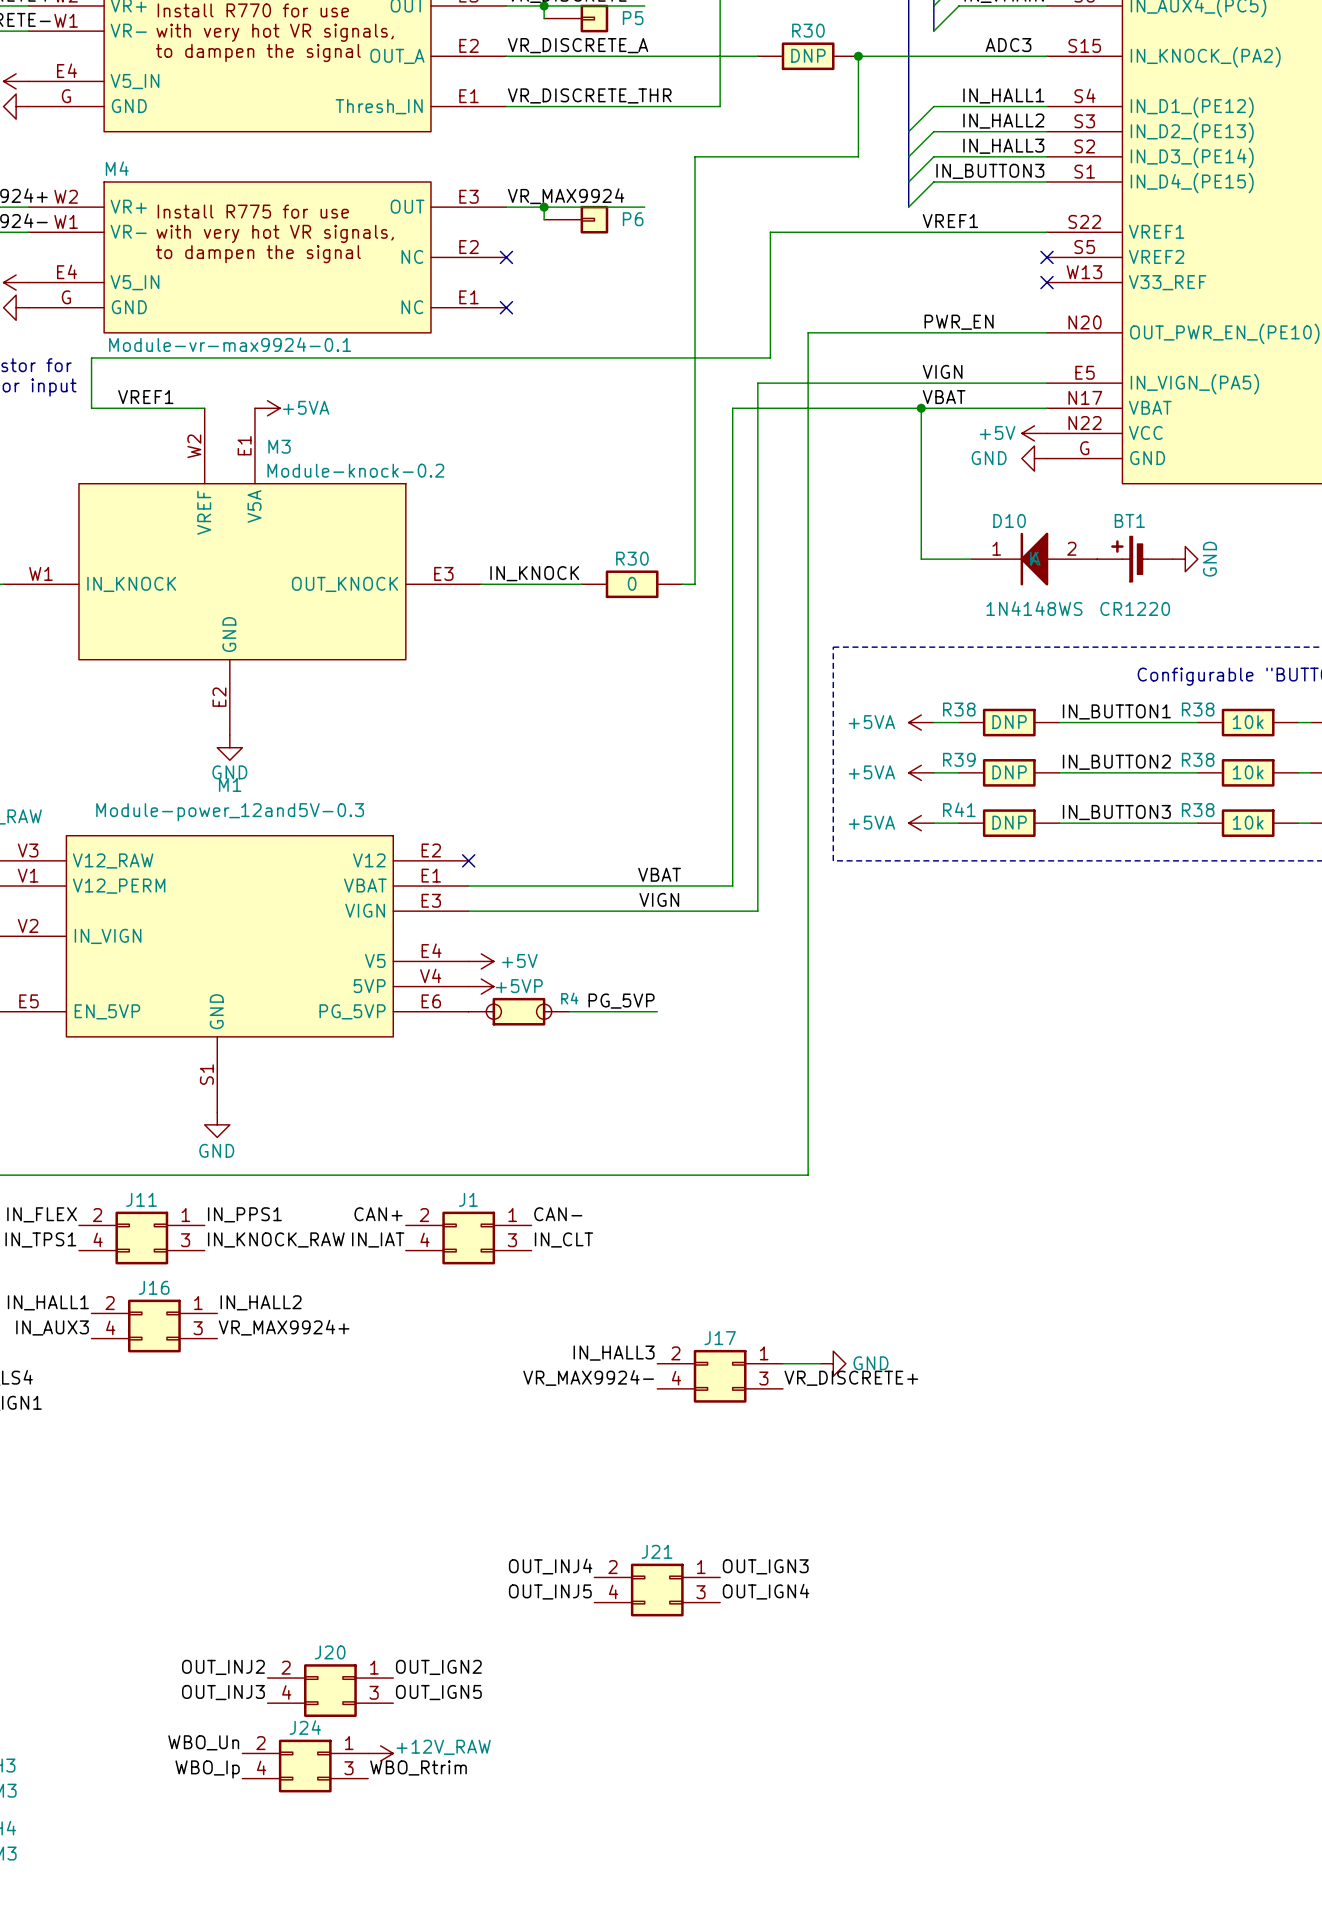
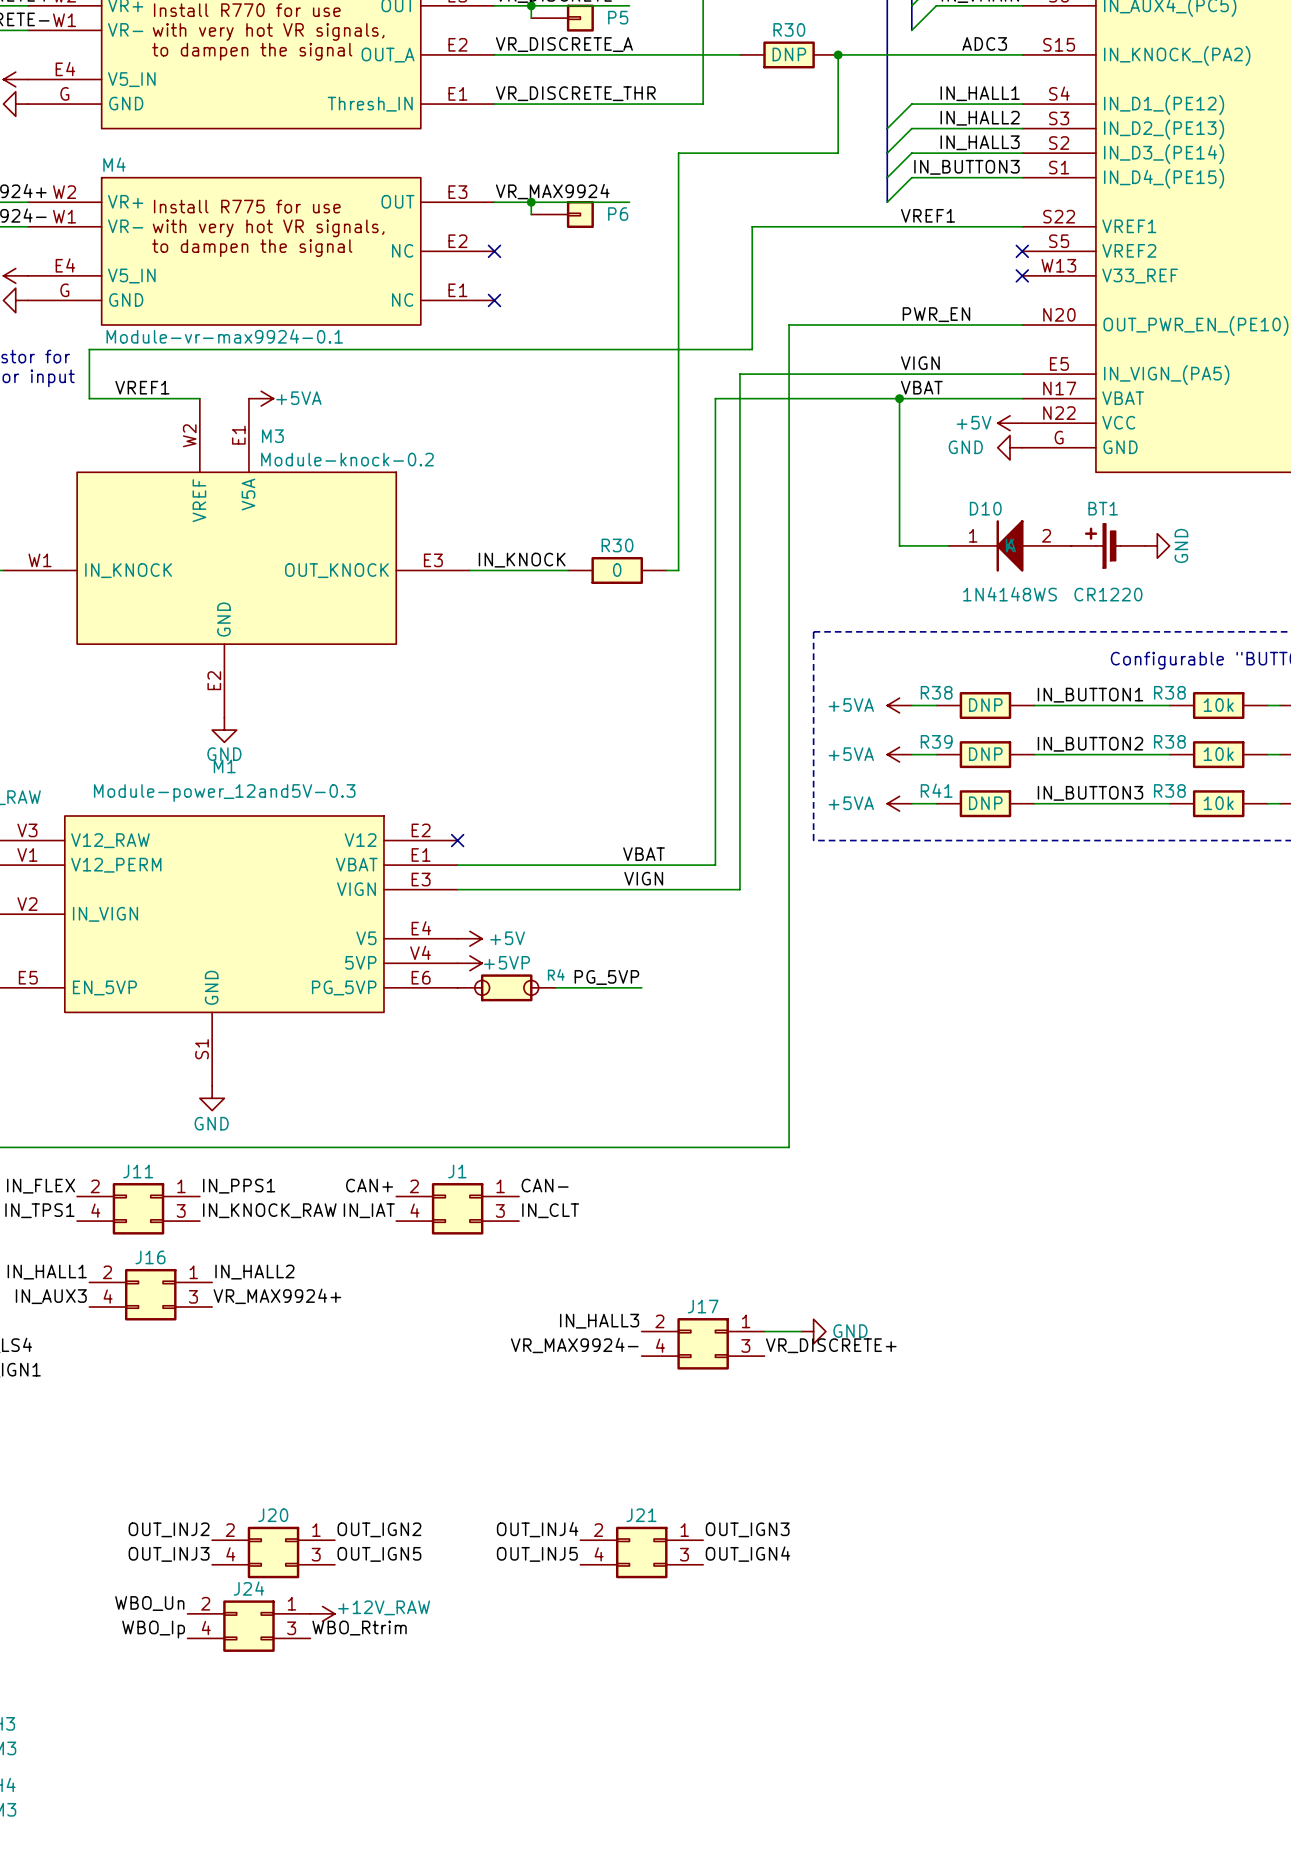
label position: OUT_INJ2 (223, 1667) -> OUT_INJ2 (169, 1529)
label position: OUT_IGN2 (438, 1667) -> OUT_IGN2 (379, 1529)
J20 position: (330, 1690) -> (273, 1552)
label position: OUT_INJ3 (223, 1692) -> OUT_INJ3 (169, 1554)
label position: OUT_IGN5 (438, 1692) -> OUT_IGN5 (379, 1554)
label position: WBO_Un (203, 1742) -> WBO_Un (149, 1603)
power symbol position: +12V_RAW (380, 1753) -> +12V_RAW (322, 1613)
J24 position: (305, 1766) -> (248, 1626)
label position: WBO_Rtrim (418, 1767) -> WBO_Rtrim (359, 1628)
label position: WBO_Ip (207, 1769) -> WBO_Ip (153, 1629)

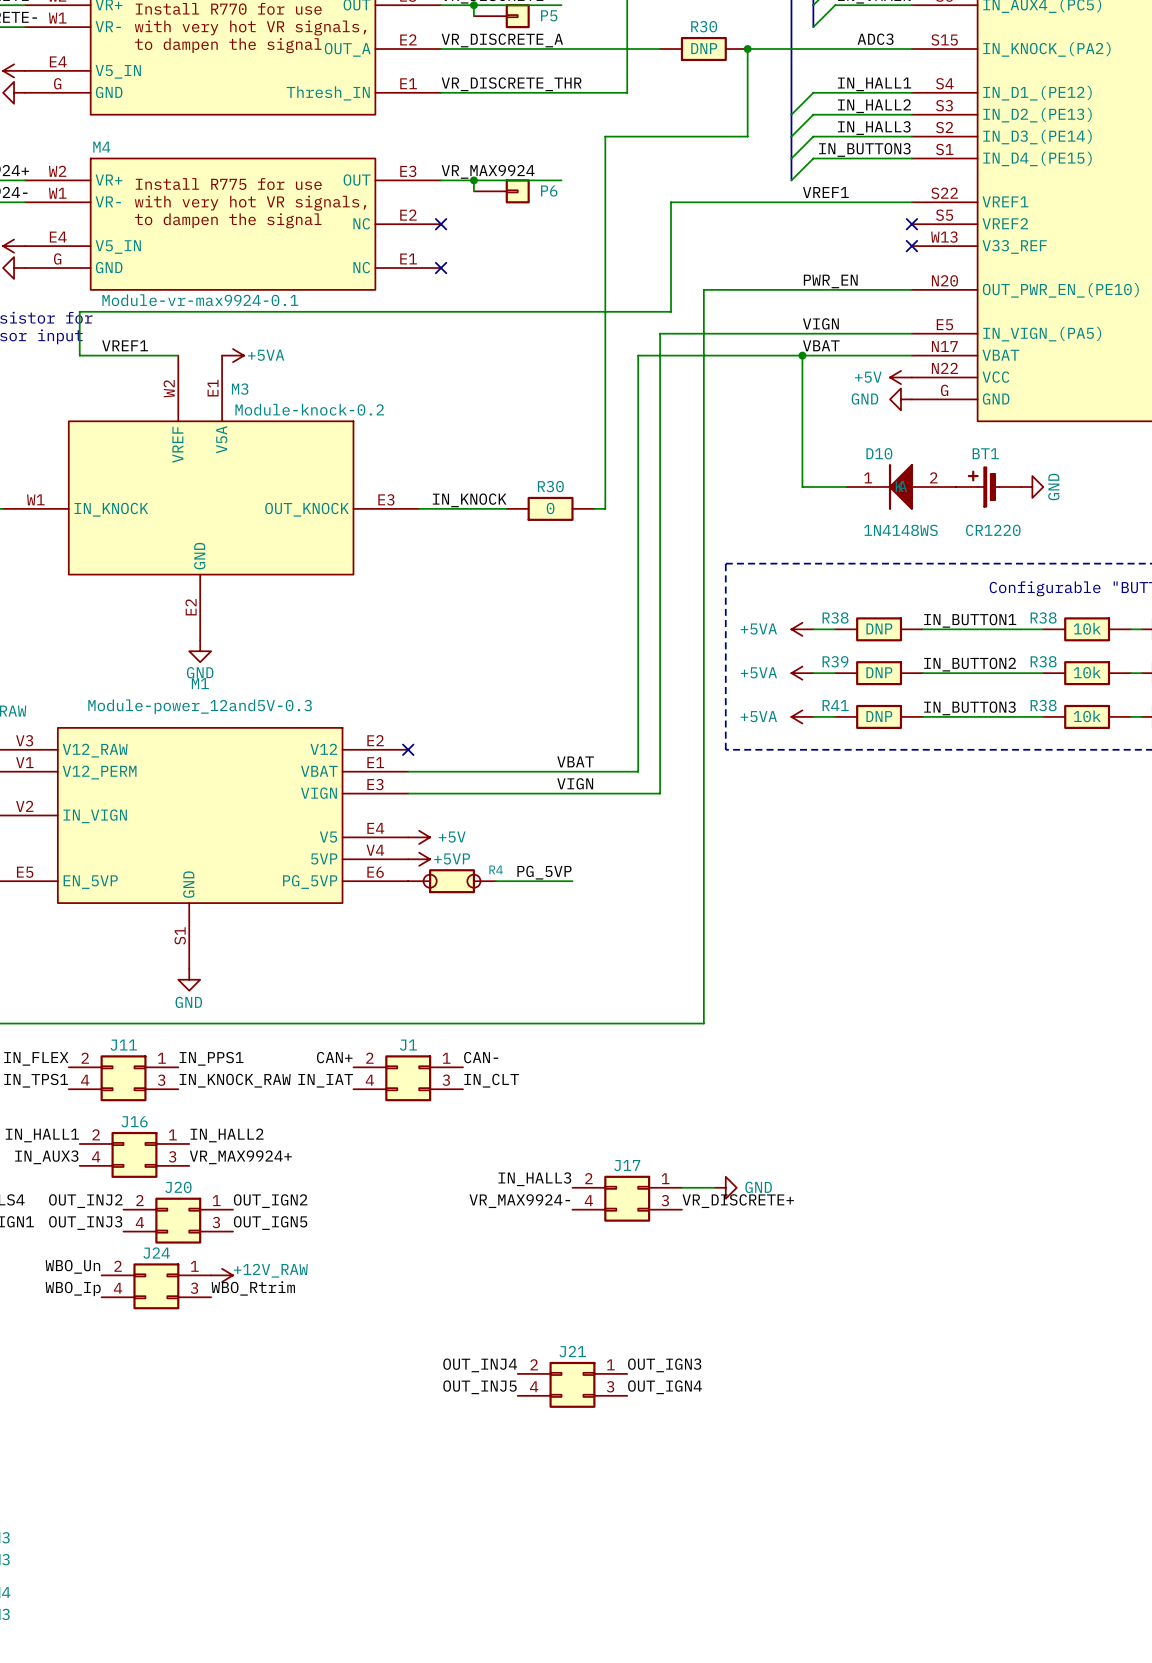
label position: OUT_INJ2 (169, 1529) -> OUT_INJ2 (85, 1201)
label position: OUT_IGN2 (379, 1529) -> OUT_IGN2 (270, 1201)
J20 position: (273, 1552) -> (178, 1220)
label position: OUT_INJ3 (169, 1554) -> OUT_INJ3 (85, 1223)
label position: OUT_IGN5 (379, 1554) -> OUT_IGN5 (270, 1223)
label position: WBO_Un (149, 1603) -> WBO_Un (72, 1266)
power symbol position: +12V_RAW (322, 1613) -> +12V_RAW (222, 1275)
J24 position: (248, 1626) -> (156, 1286)
label position: WBO_Rtrim (359, 1628) -> WBO_Rtrim (253, 1288)
label position: WBO_Ip (153, 1629) -> WBO_Ip (73, 1288)

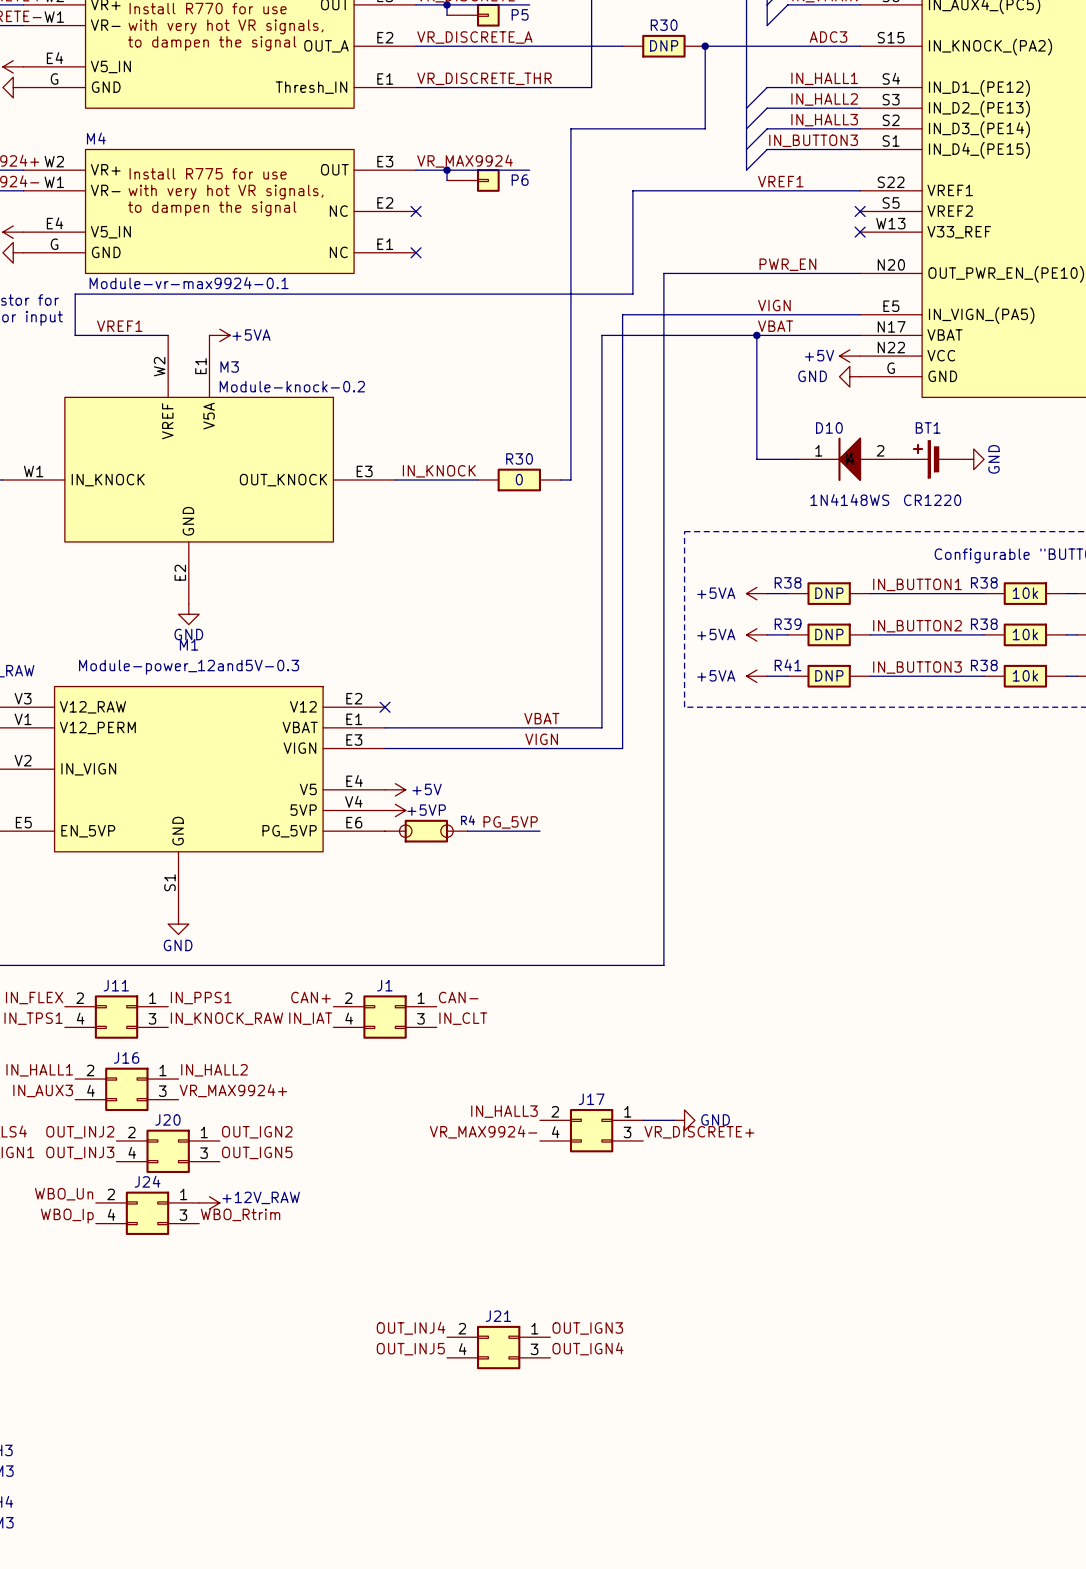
label position: OUT_INJ4 (480, 1365) -> OUT_INJ4 (411, 1328)
label position: OUT_IGN3 (664, 1365) -> OUT_IGN3 (587, 1328)
J21 position: (572, 1384) -> (498, 1347)
label position: OUT_INJ5 (479, 1387) -> OUT_INJ5 (410, 1349)
label position: OUT_IGN4 (665, 1387) -> OUT_IGN4 (587, 1348)

